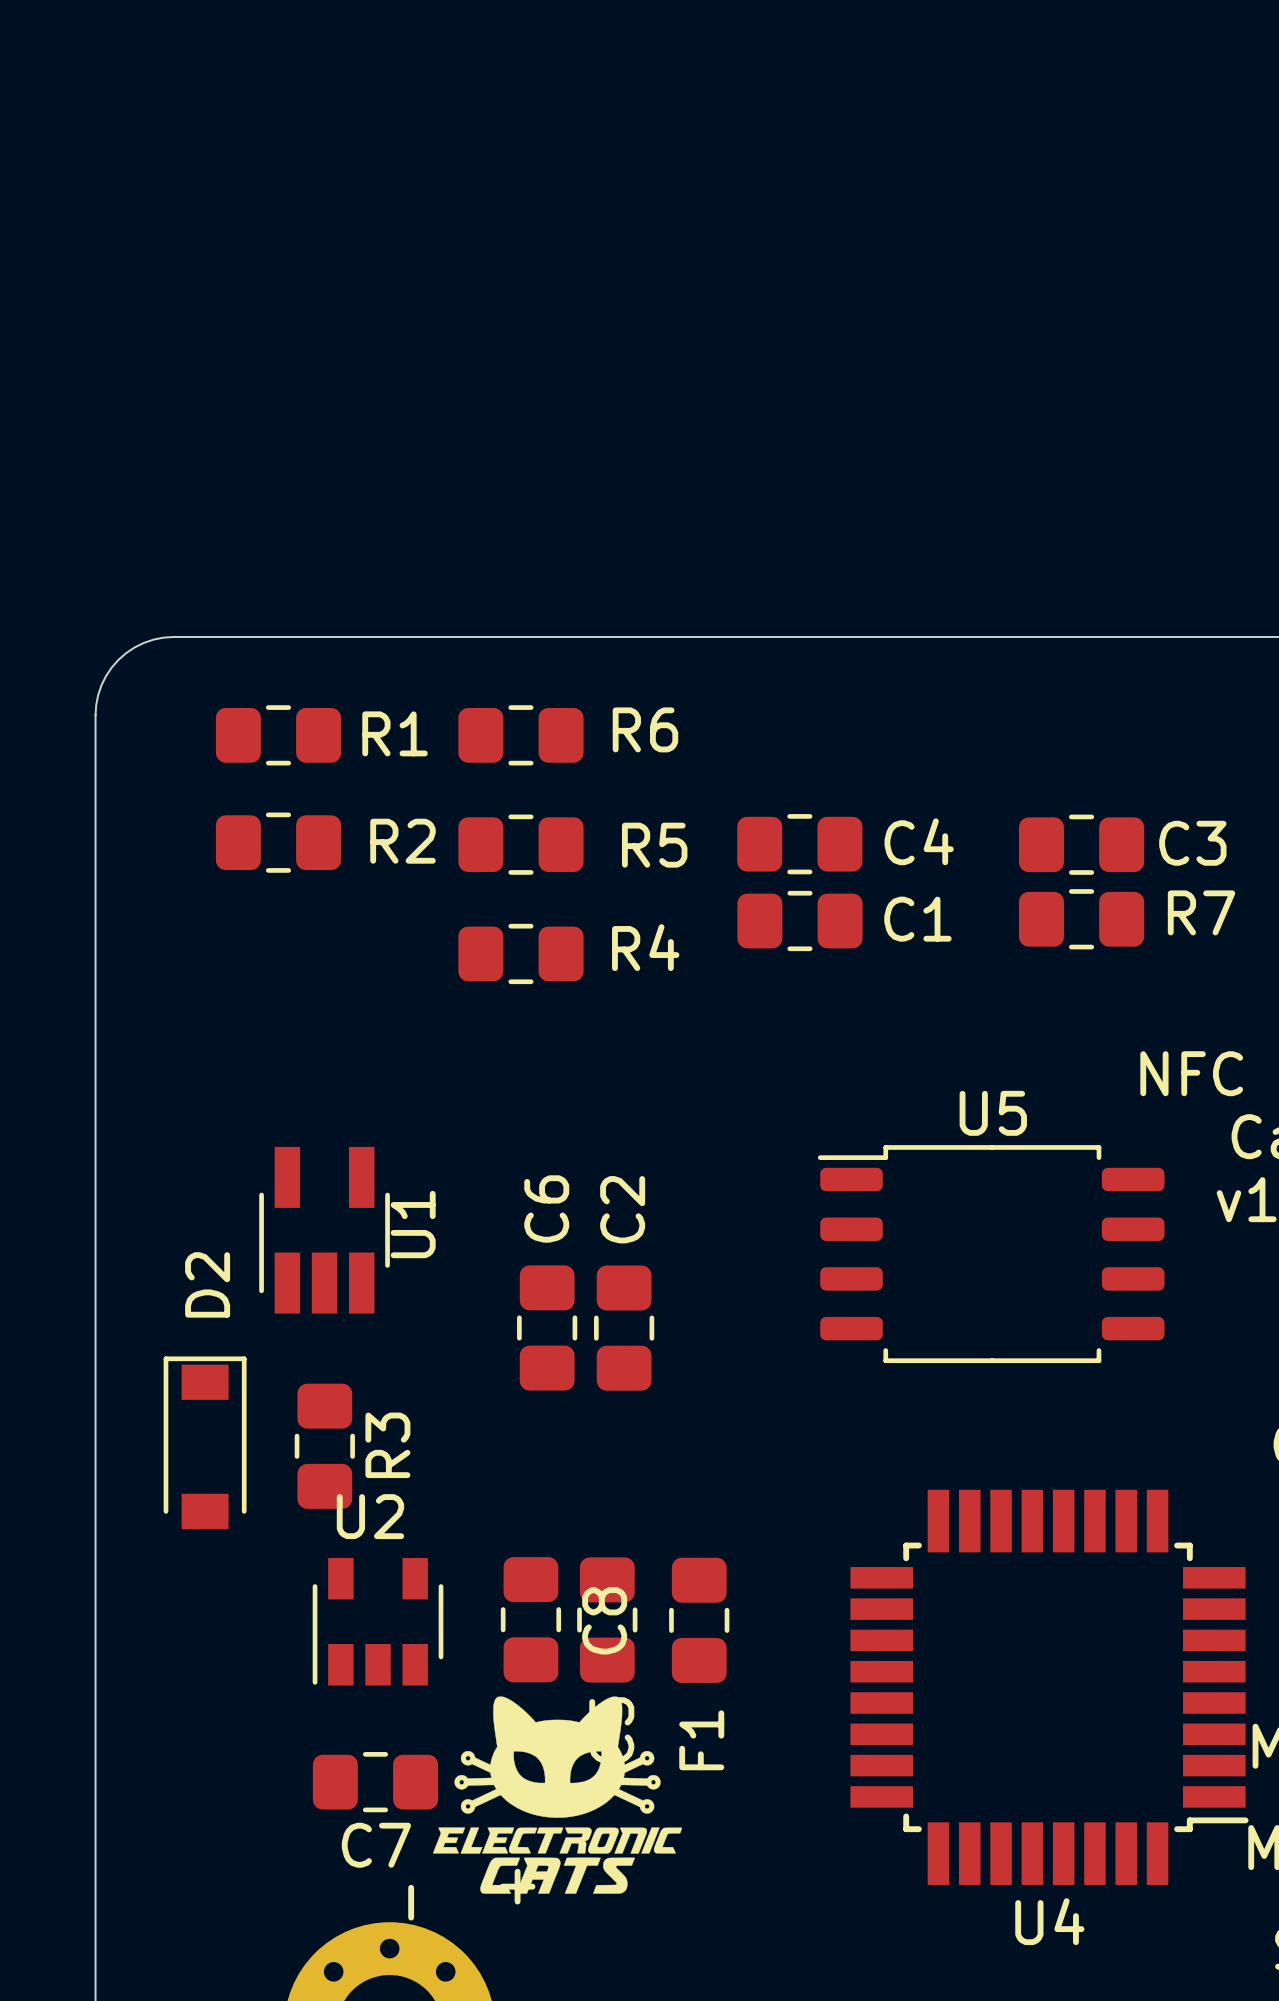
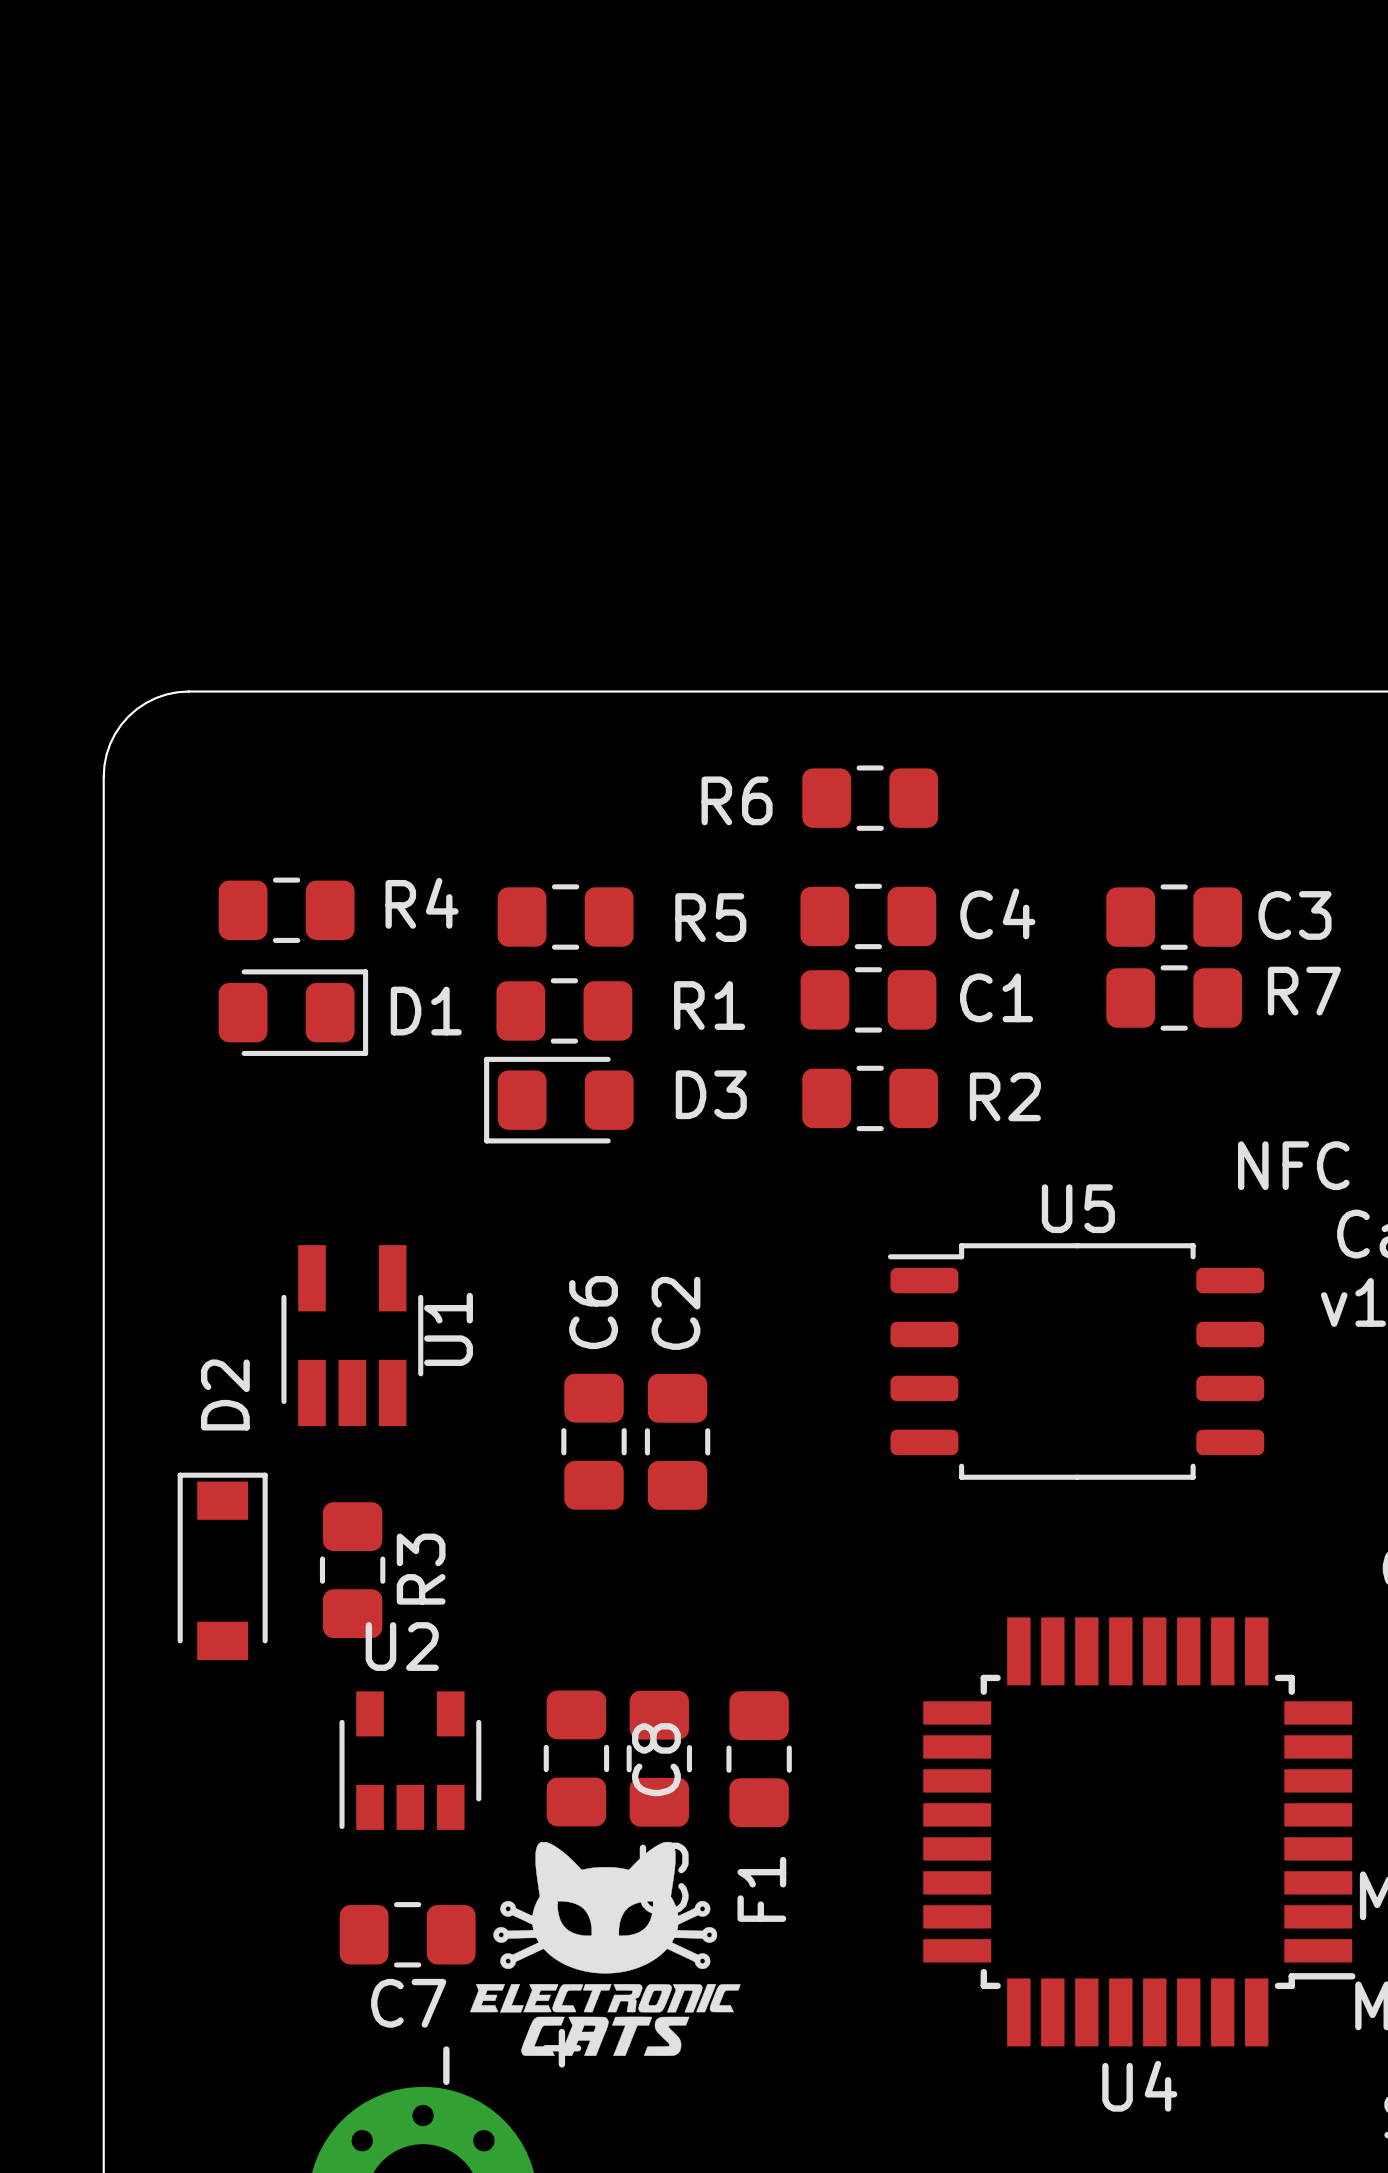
R6 name position: R6 (645, 729) -> R6 (737, 800)
R1 name position: R1 (395, 733) -> R1 (709, 1005)
R1 position: (278, 735) -> (564, 1010)
R6 position: (520, 735) -> (870, 798)
R2 position: (278, 842) -> (870, 1098)
D1: none -> (293, 1012)
R4 position: (520, 953) -> (286, 910)
D3: none -> (558, 1100)

